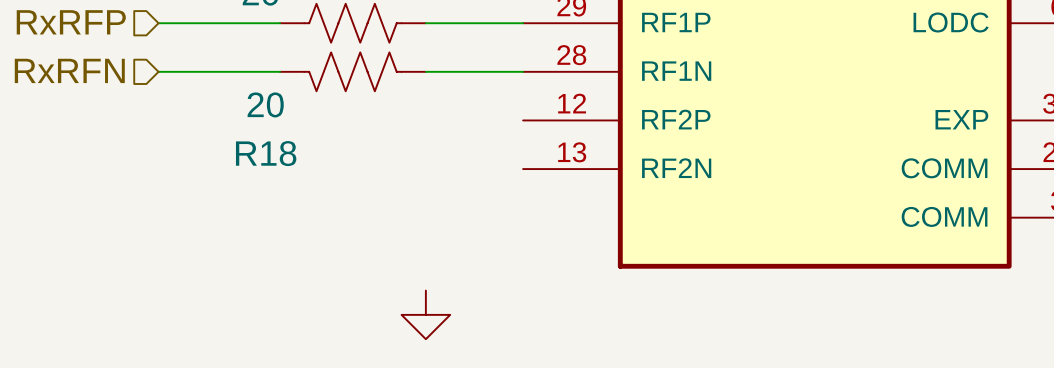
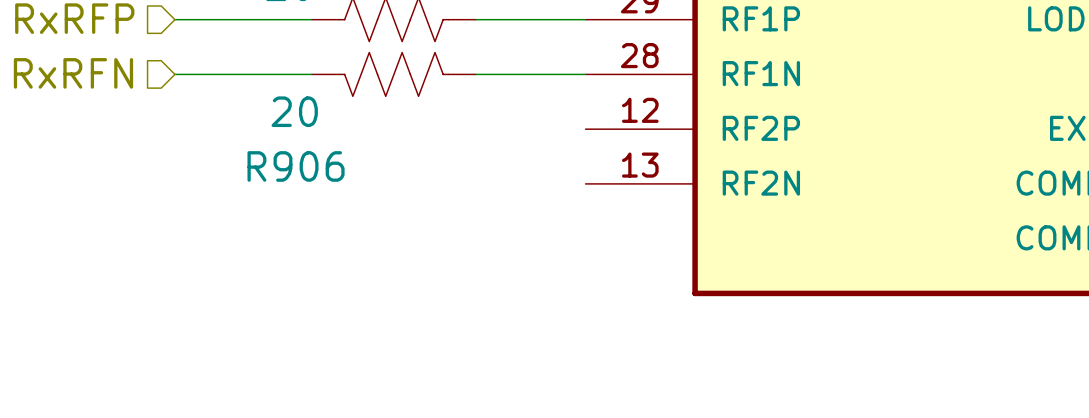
R18 name: R18 (266, 153) -> R906 (296, 166)
power symbol: (425, 314) -> none

